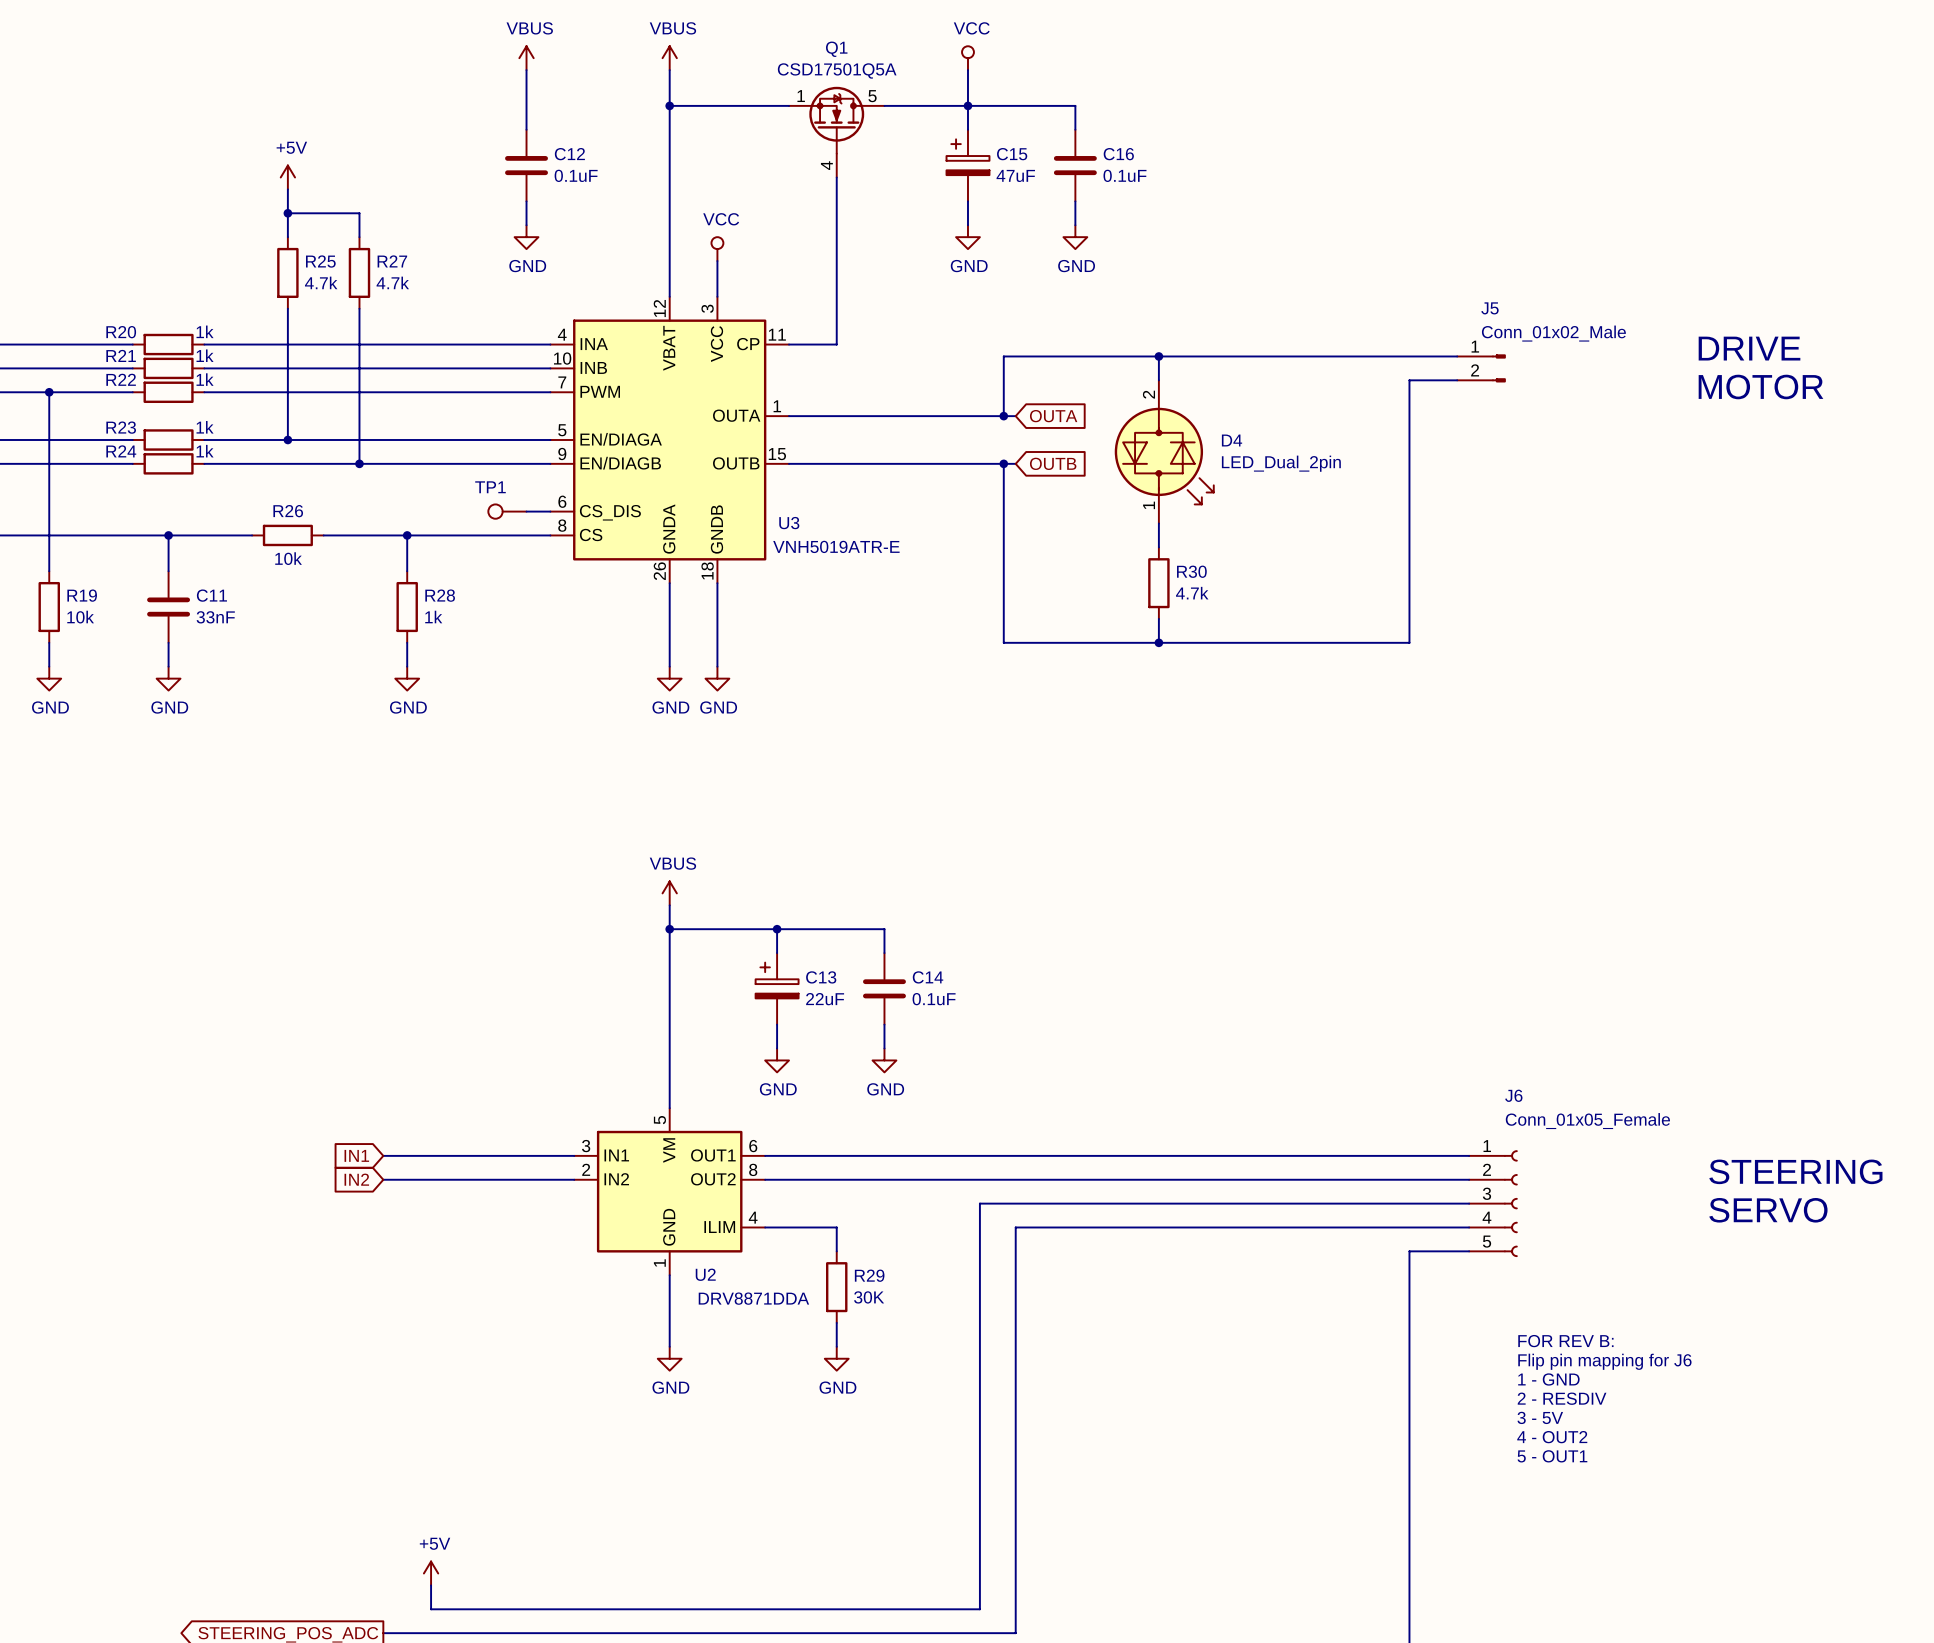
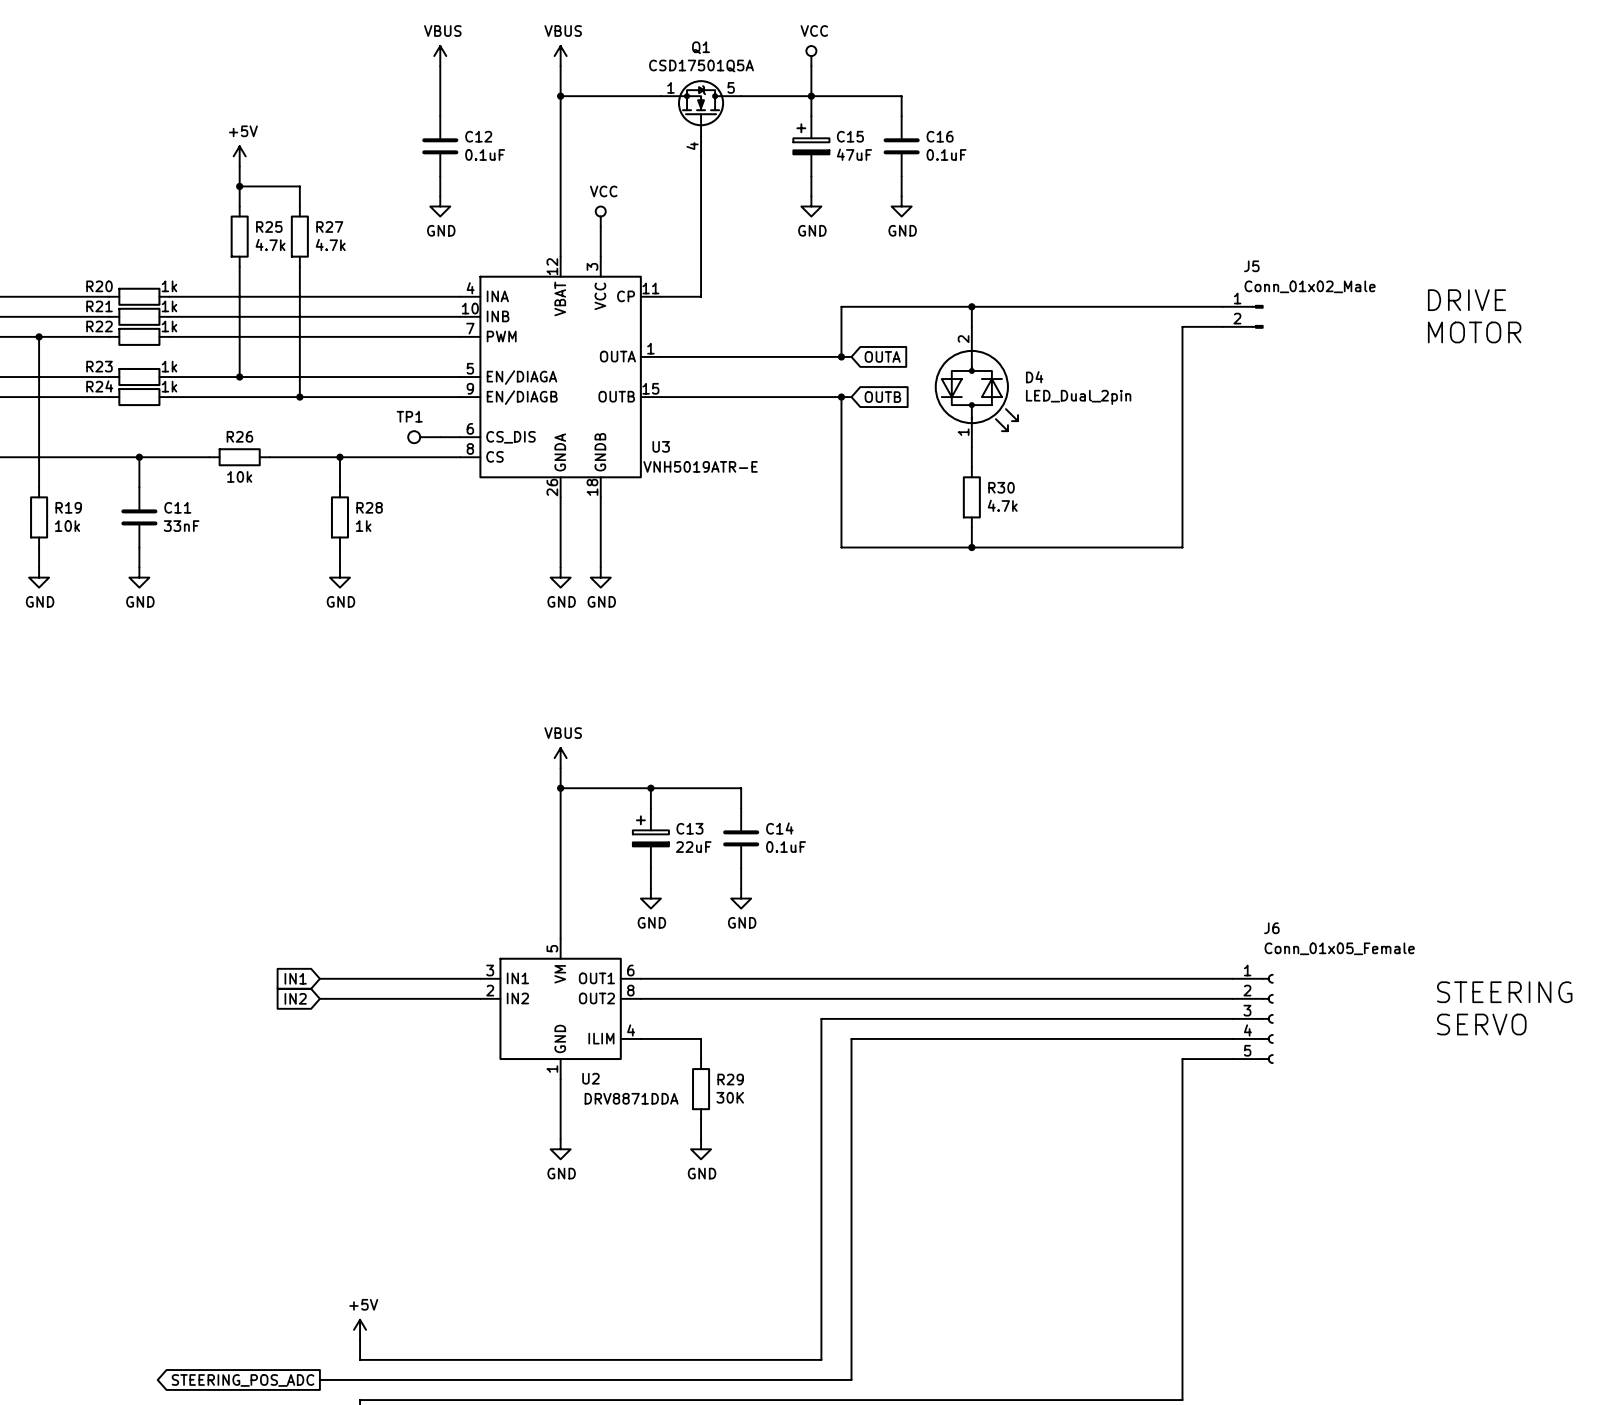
text: FOR REV B: (1565, 1341) -> none
text: Flip pin mapping for J6 (1604, 1361) -> none
text: 1 - GND (1548, 1379) -> none
text: 2 - RESDIV (1562, 1398) -> none
text: 3 - 5V (1540, 1417) -> none
text: 4 - OUT2 (1552, 1437) -> none
text: 5 - OUT1 (1552, 1456) -> none

